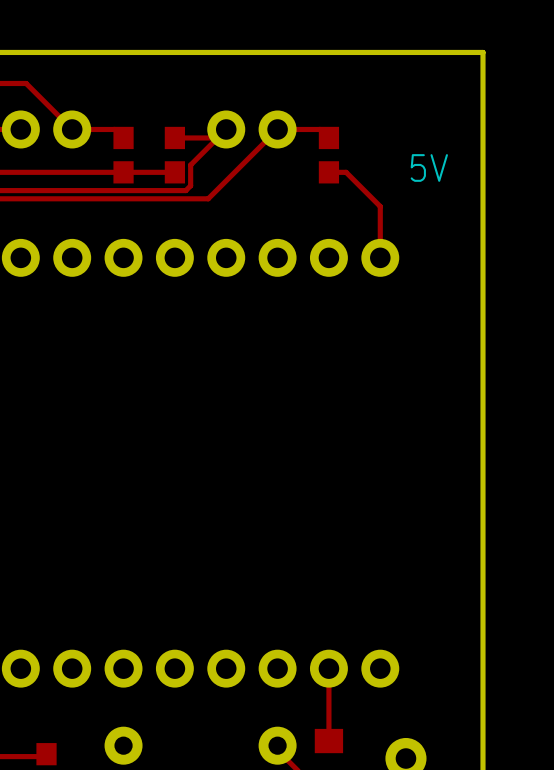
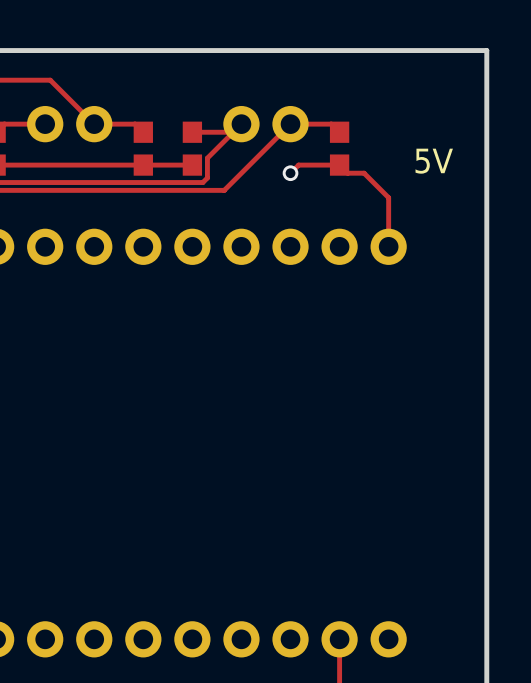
top track: (328, 172) (346, 172) (354, 180) -> (290, 173) (298, 165) (339, 165) (347, 173) (364, 173)
via: none -> (290, 173)

